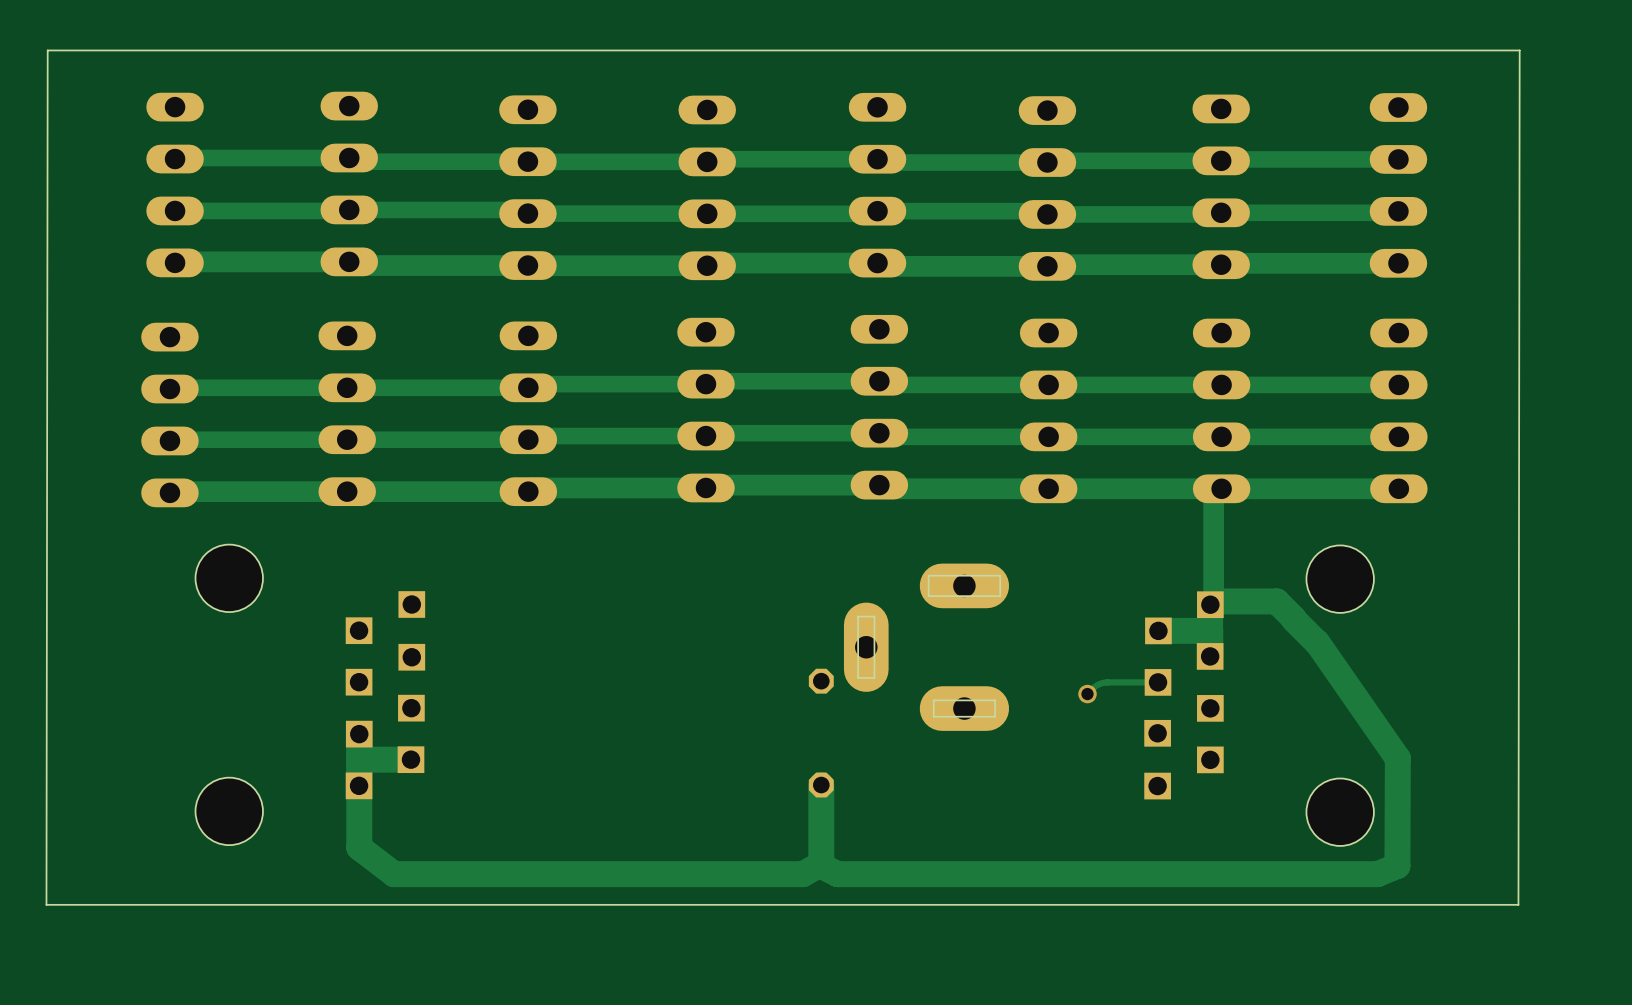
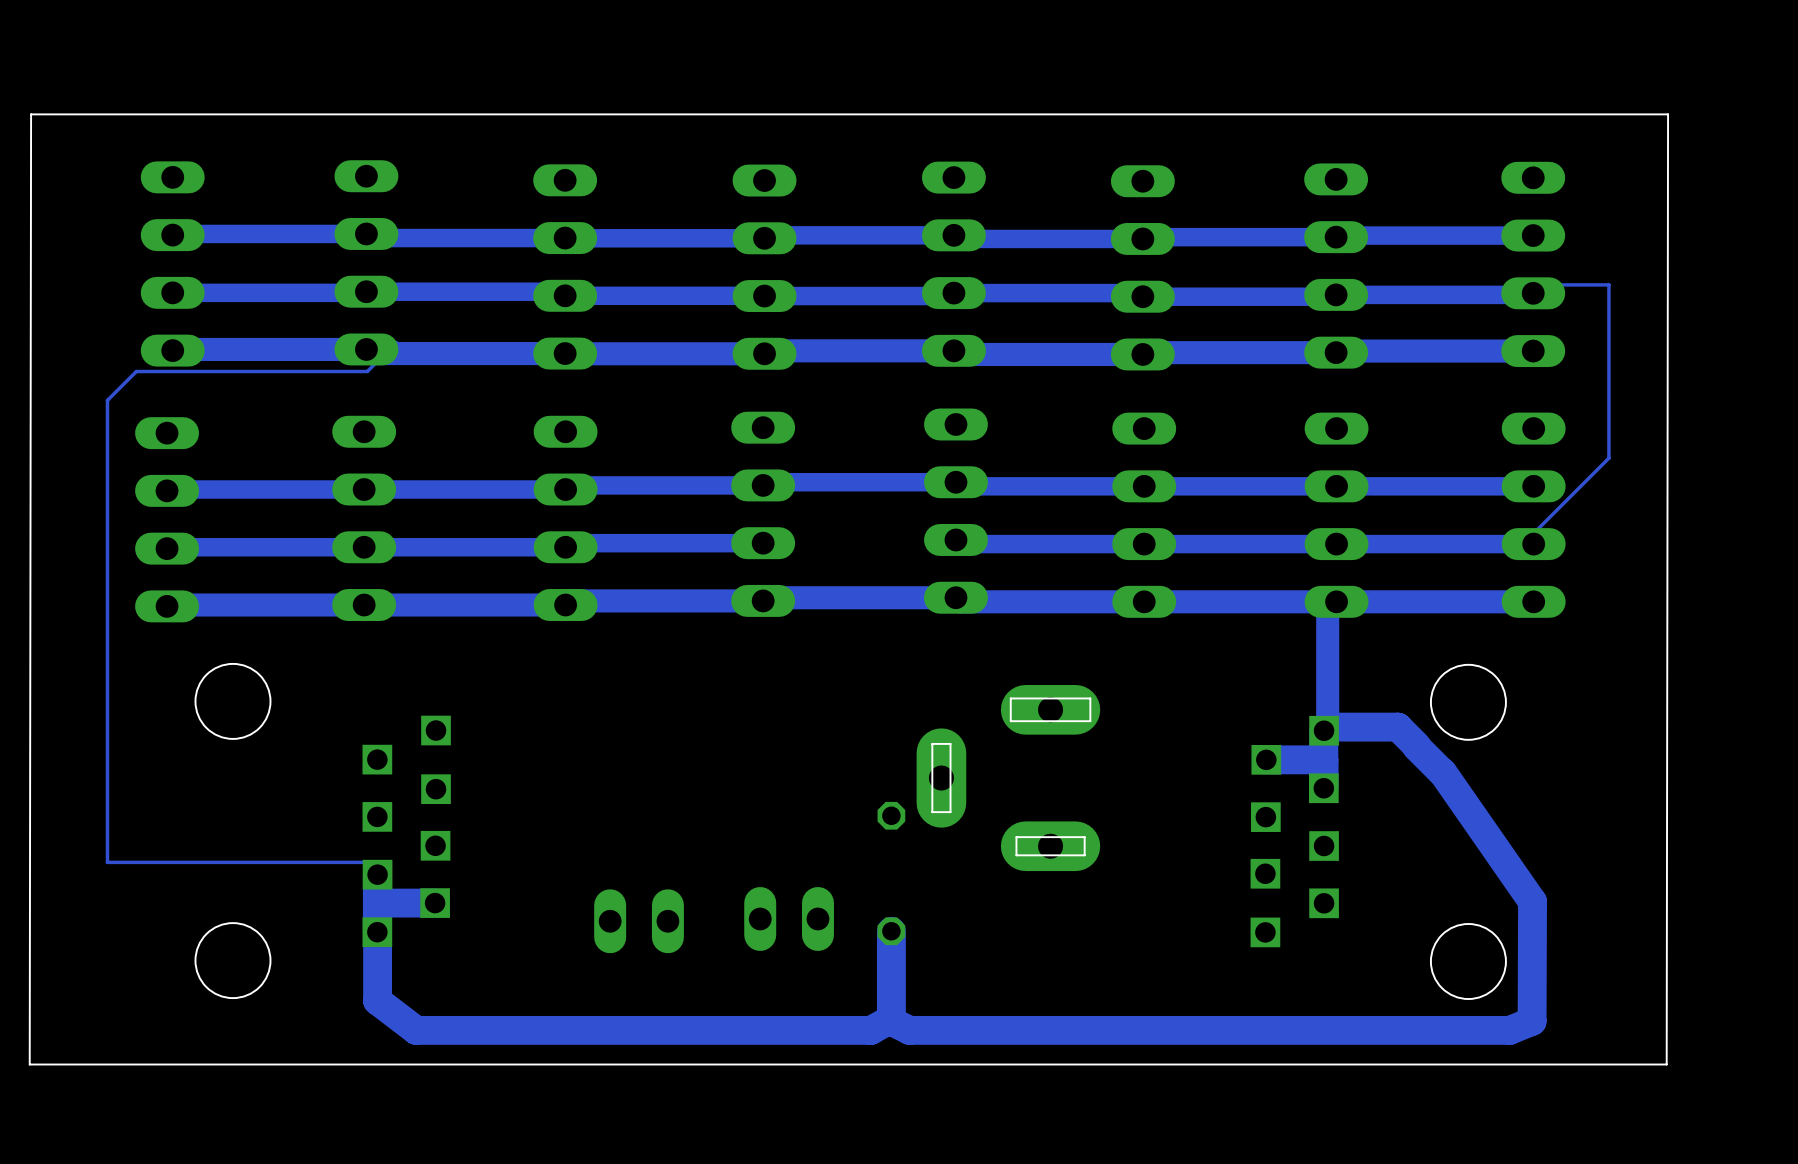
track: none -> (1533, 293) (1551, 284) (1608, 284) (1608, 458) (1522, 544) (1533, 544)
track: none -> (366, 349) (396, 342) (367, 371) (136, 371) (107, 400) (107, 862) (367, 862) (377, 874)
track: (879, 433) (706, 433) (706, 436) -> none
track: (1158, 682) (1104, 682) (1097, 685) (1087, 694) -> none
via: (1087, 694) -> none
part: none -> (789, 918)
part: none -> (639, 921)

